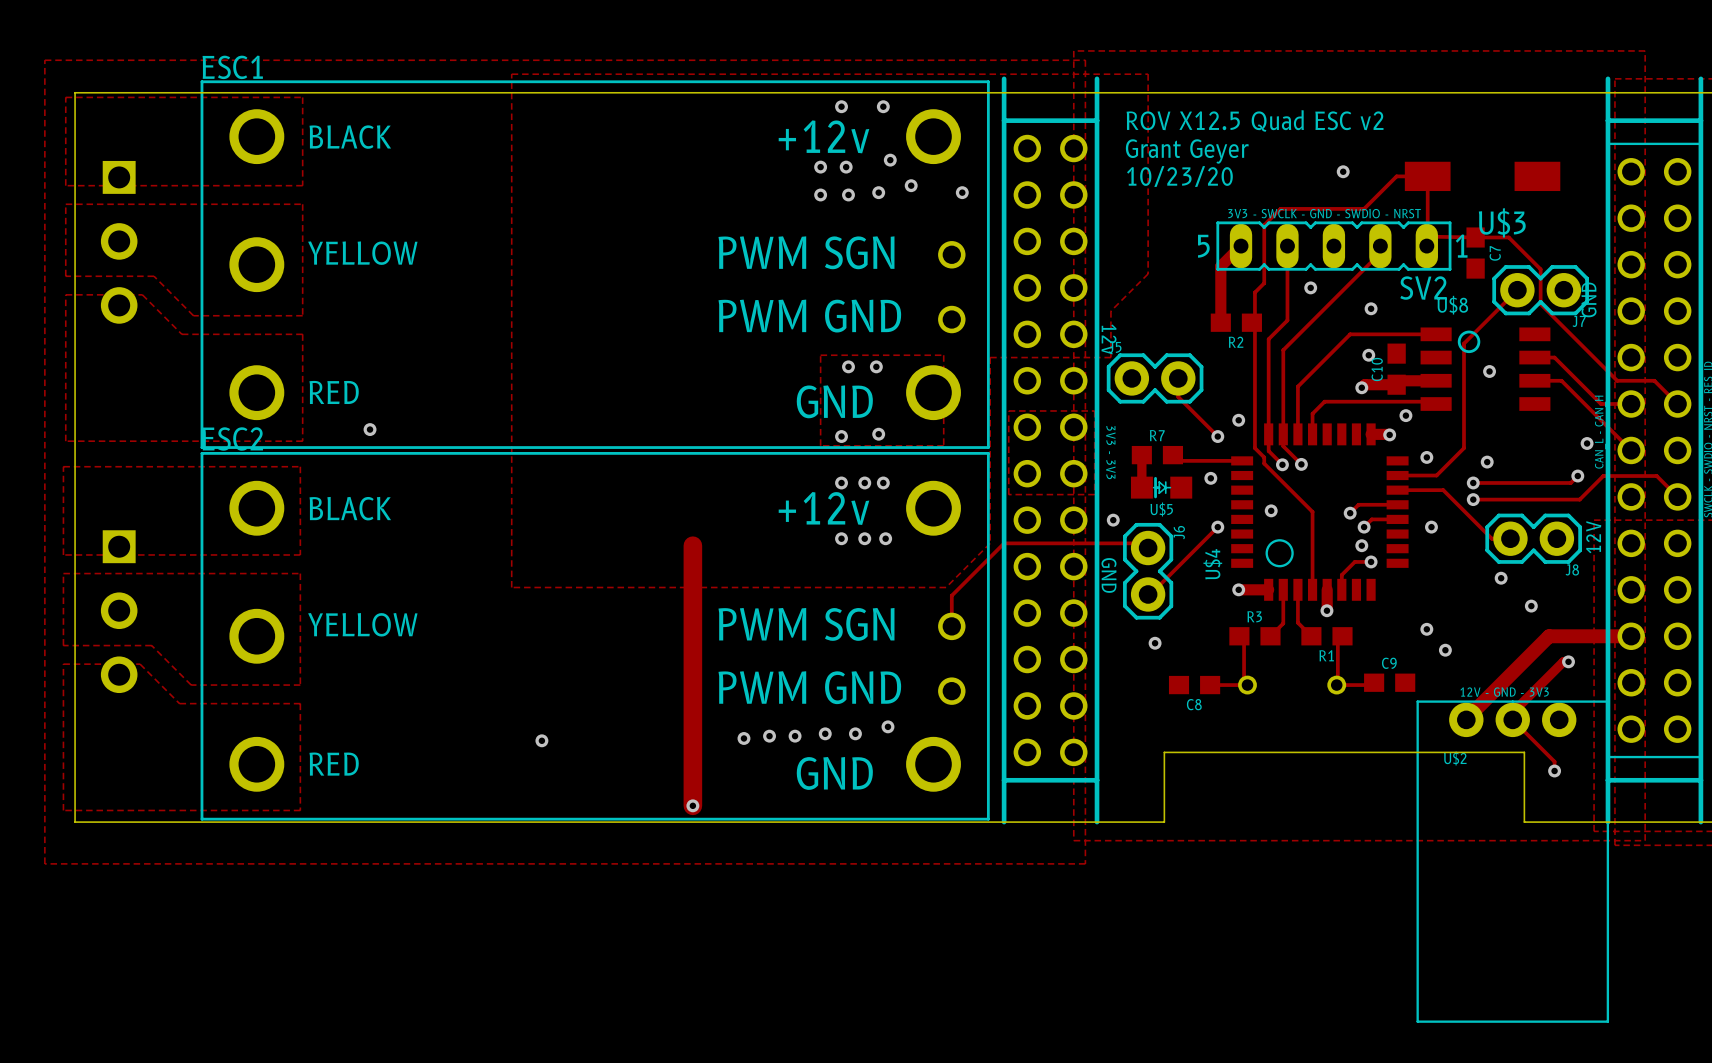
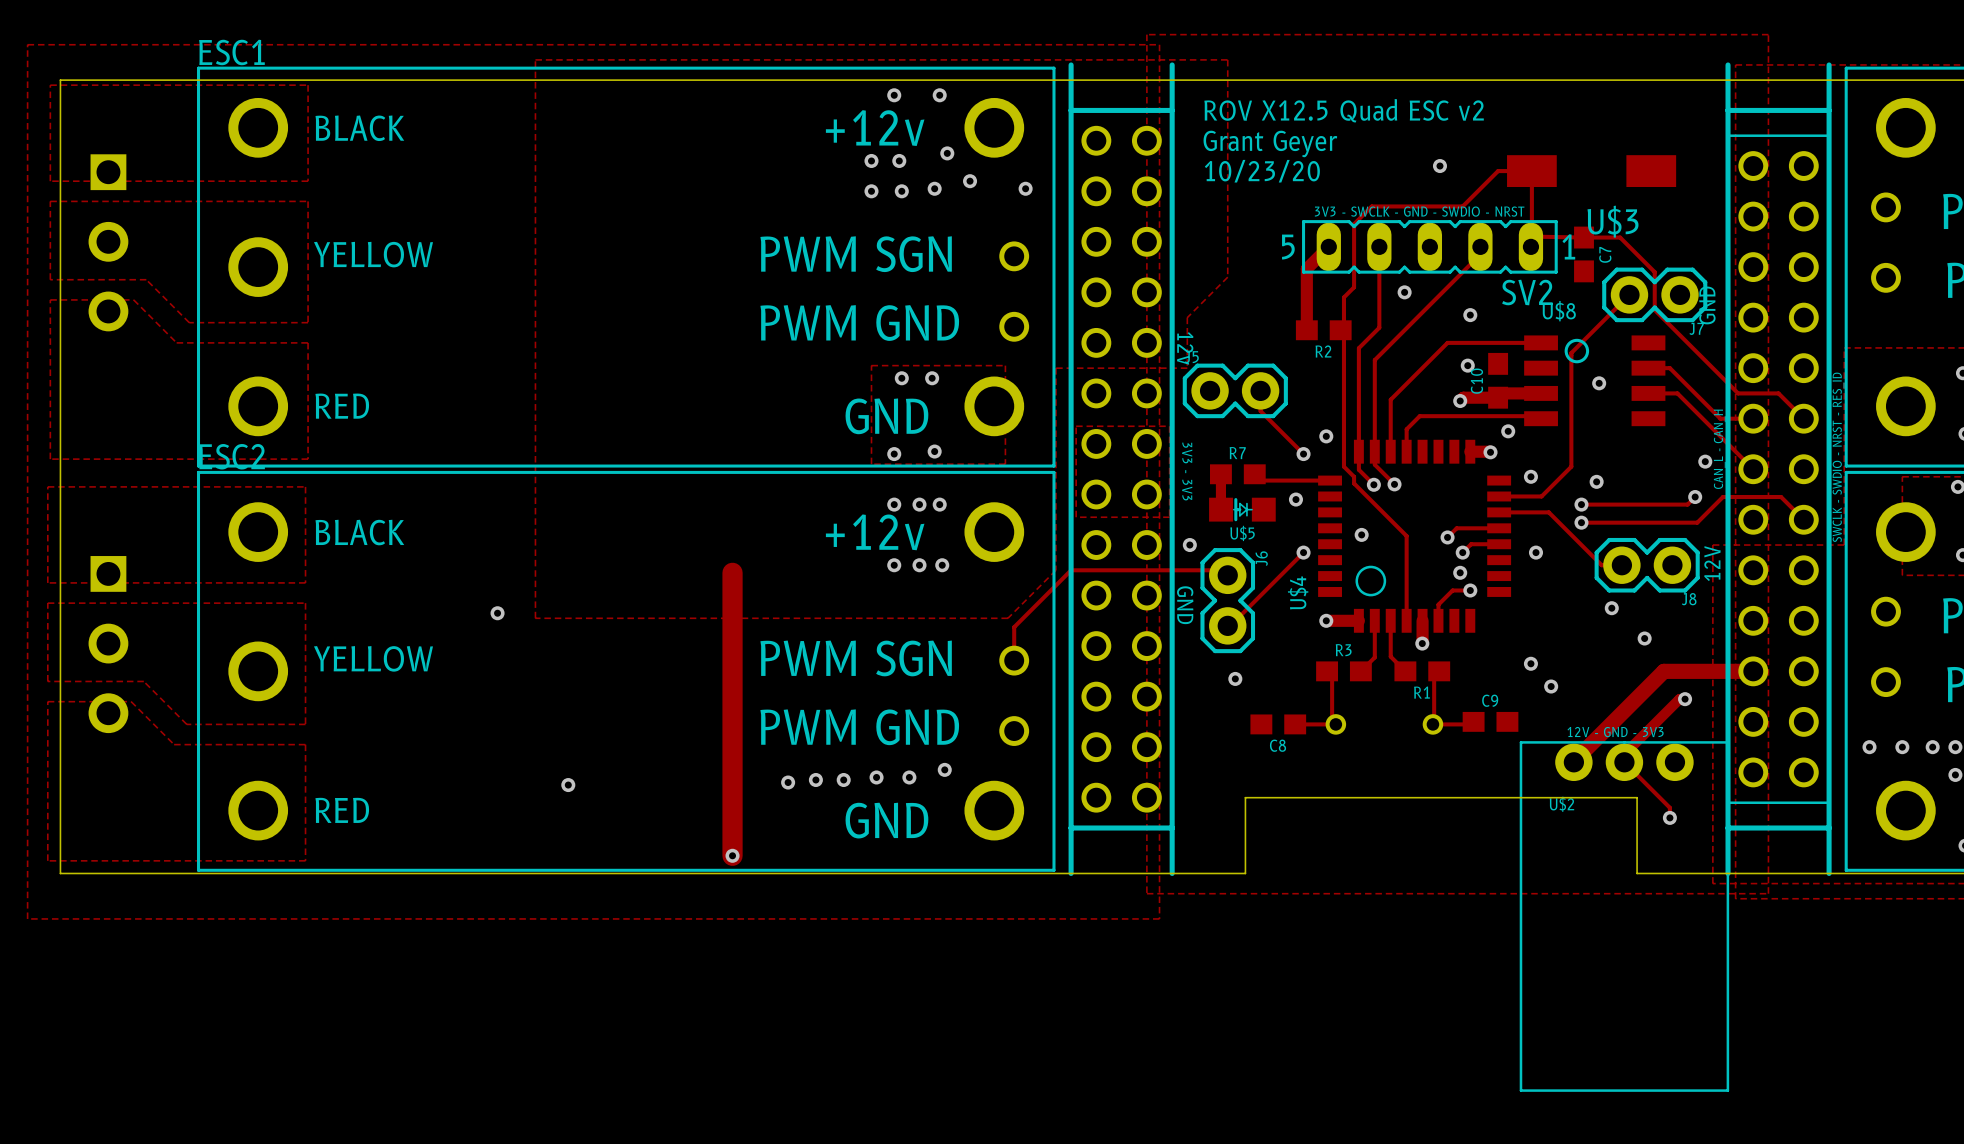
via: (370, 429) -> none
via: none -> (497, 613)

